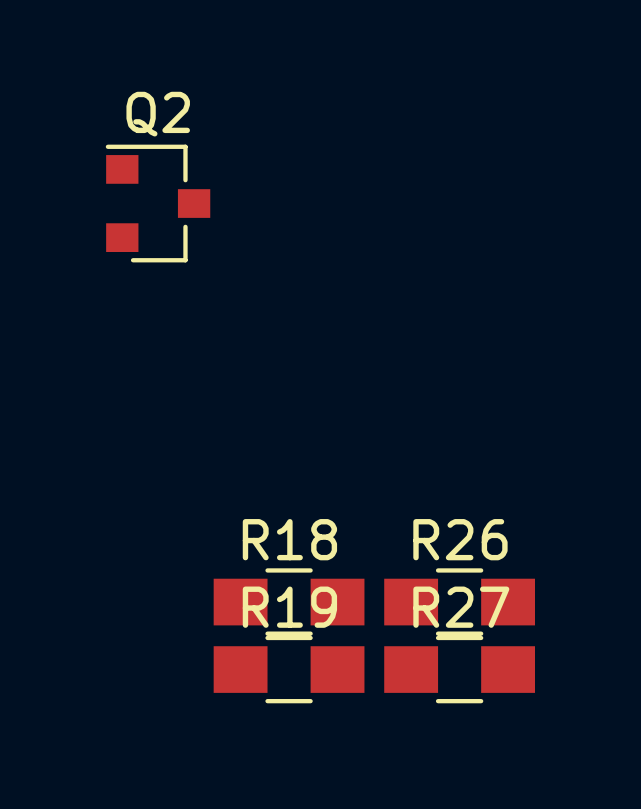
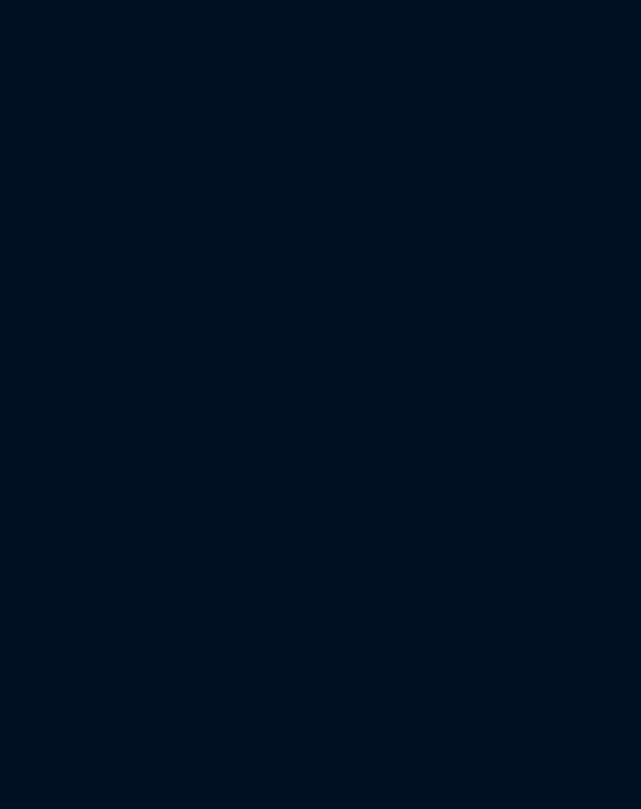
Q2: (158, 203) -> none
R18: (289, 602) -> none
R26: (459, 602) -> none
R19: (289, 669) -> none
R27: (459, 669) -> none

